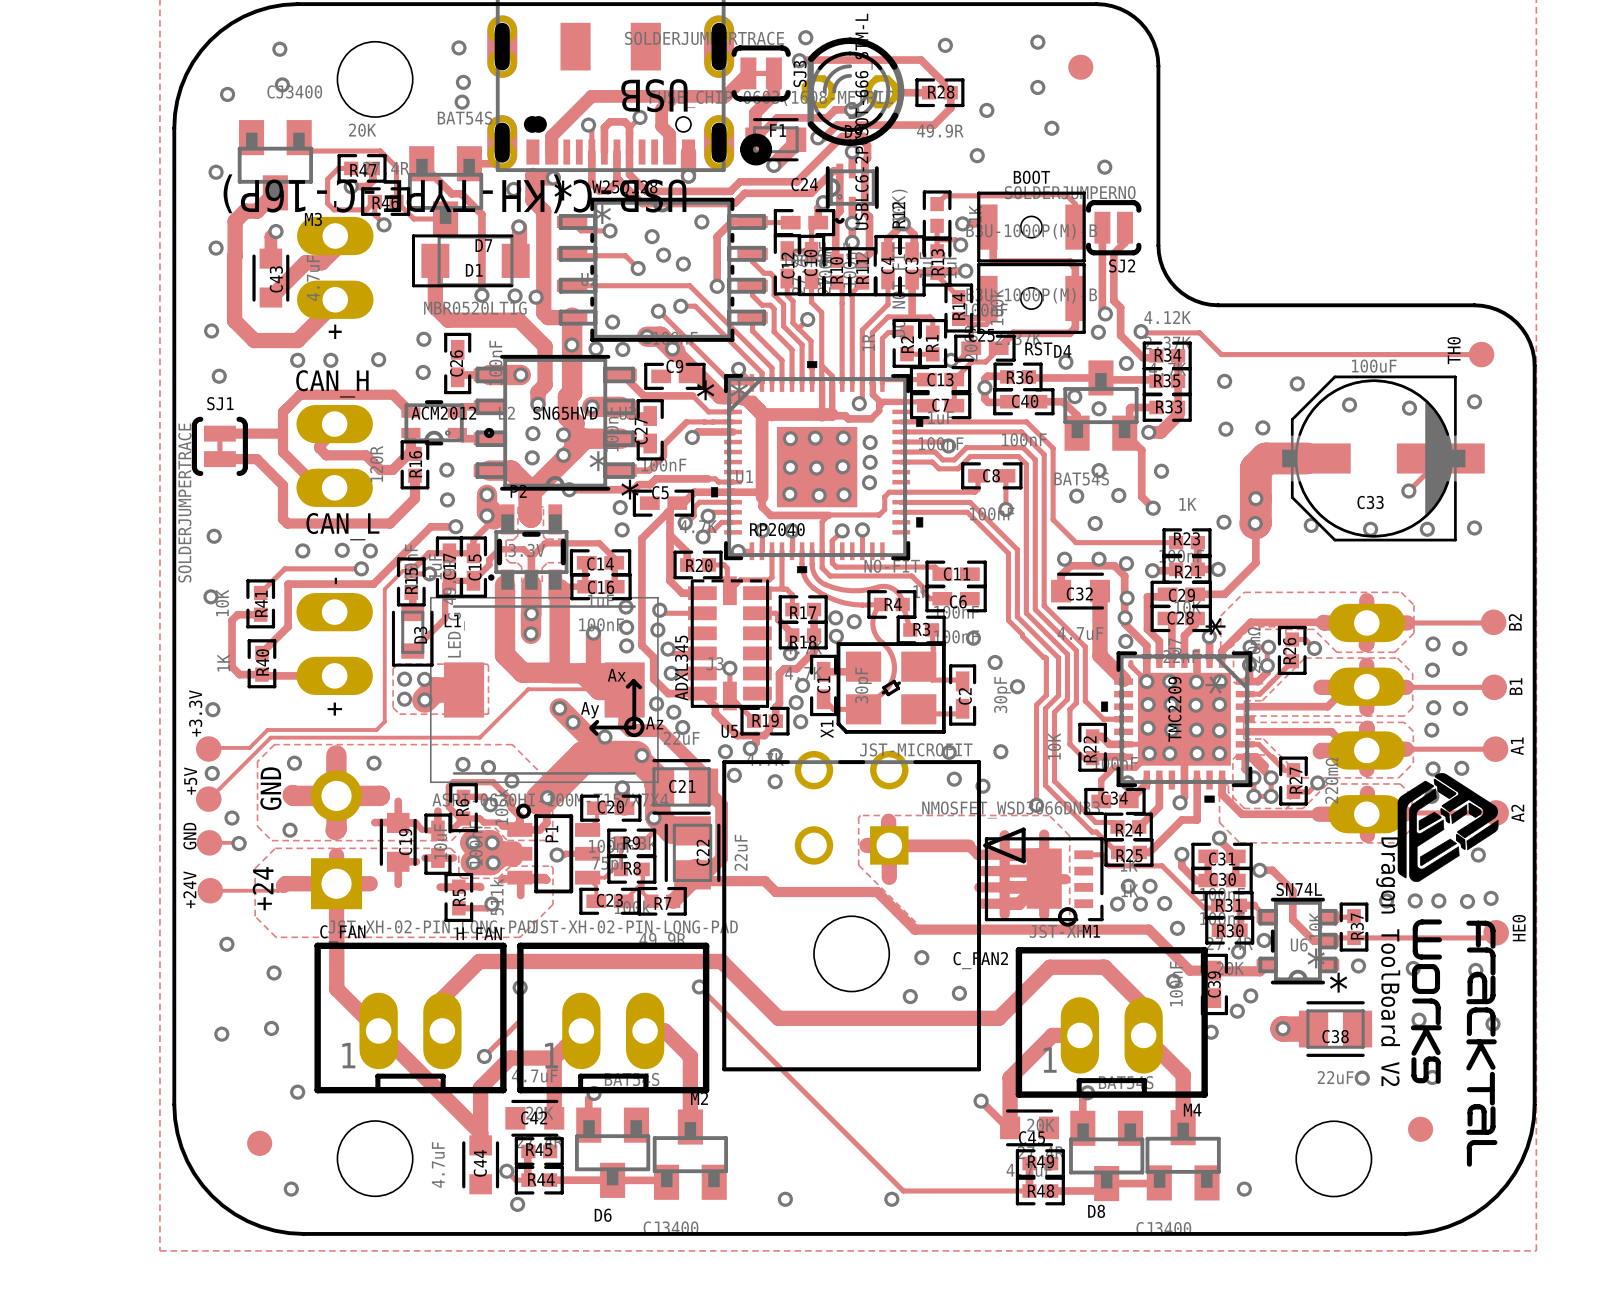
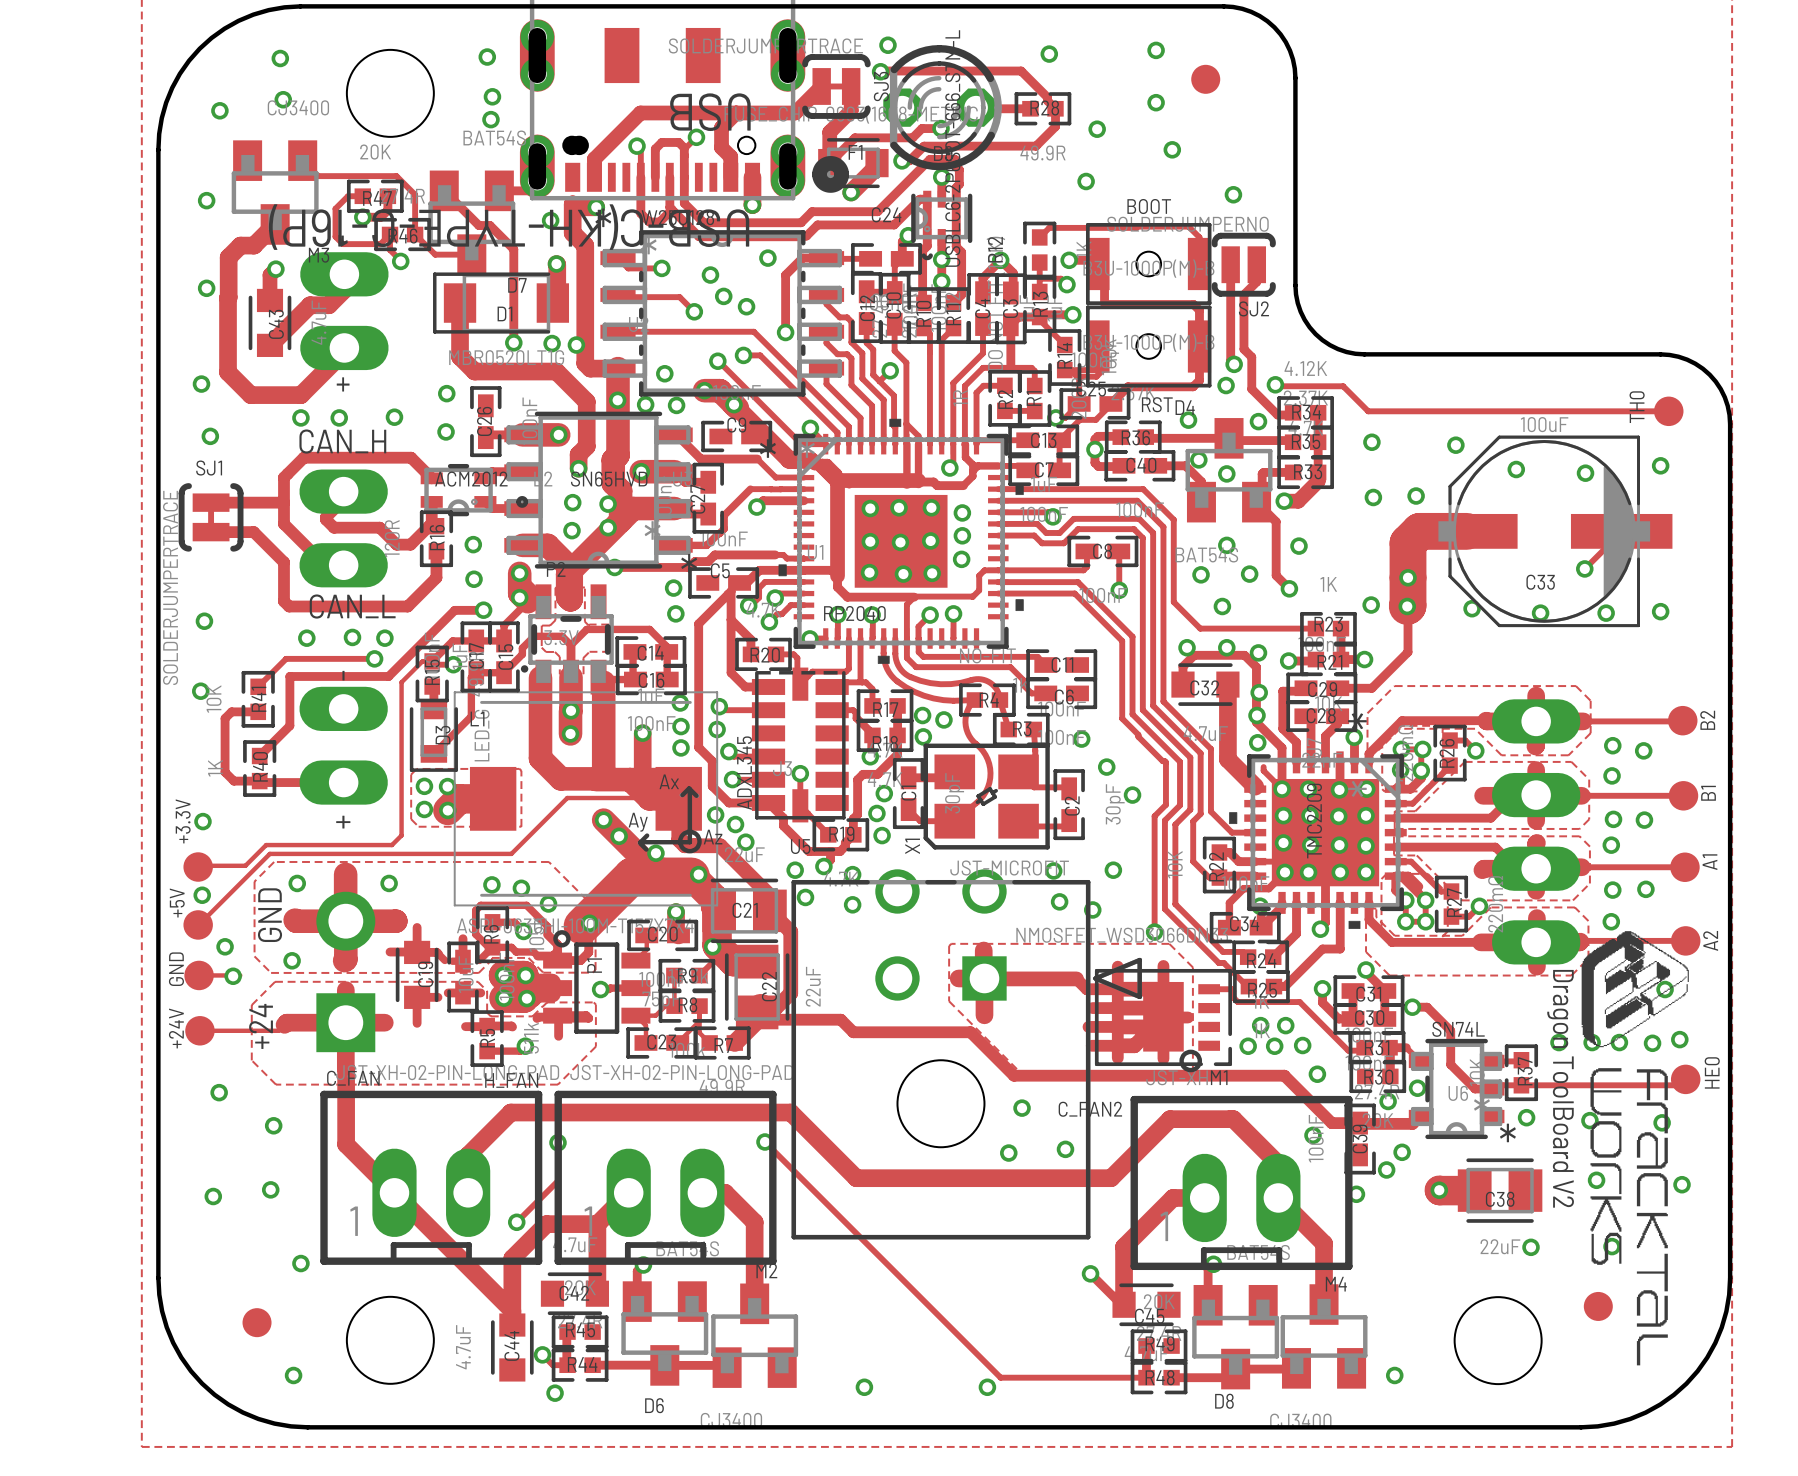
drawing shape: [1397, 773, 1499, 1167] -> [1581, 931, 1689, 1366]

